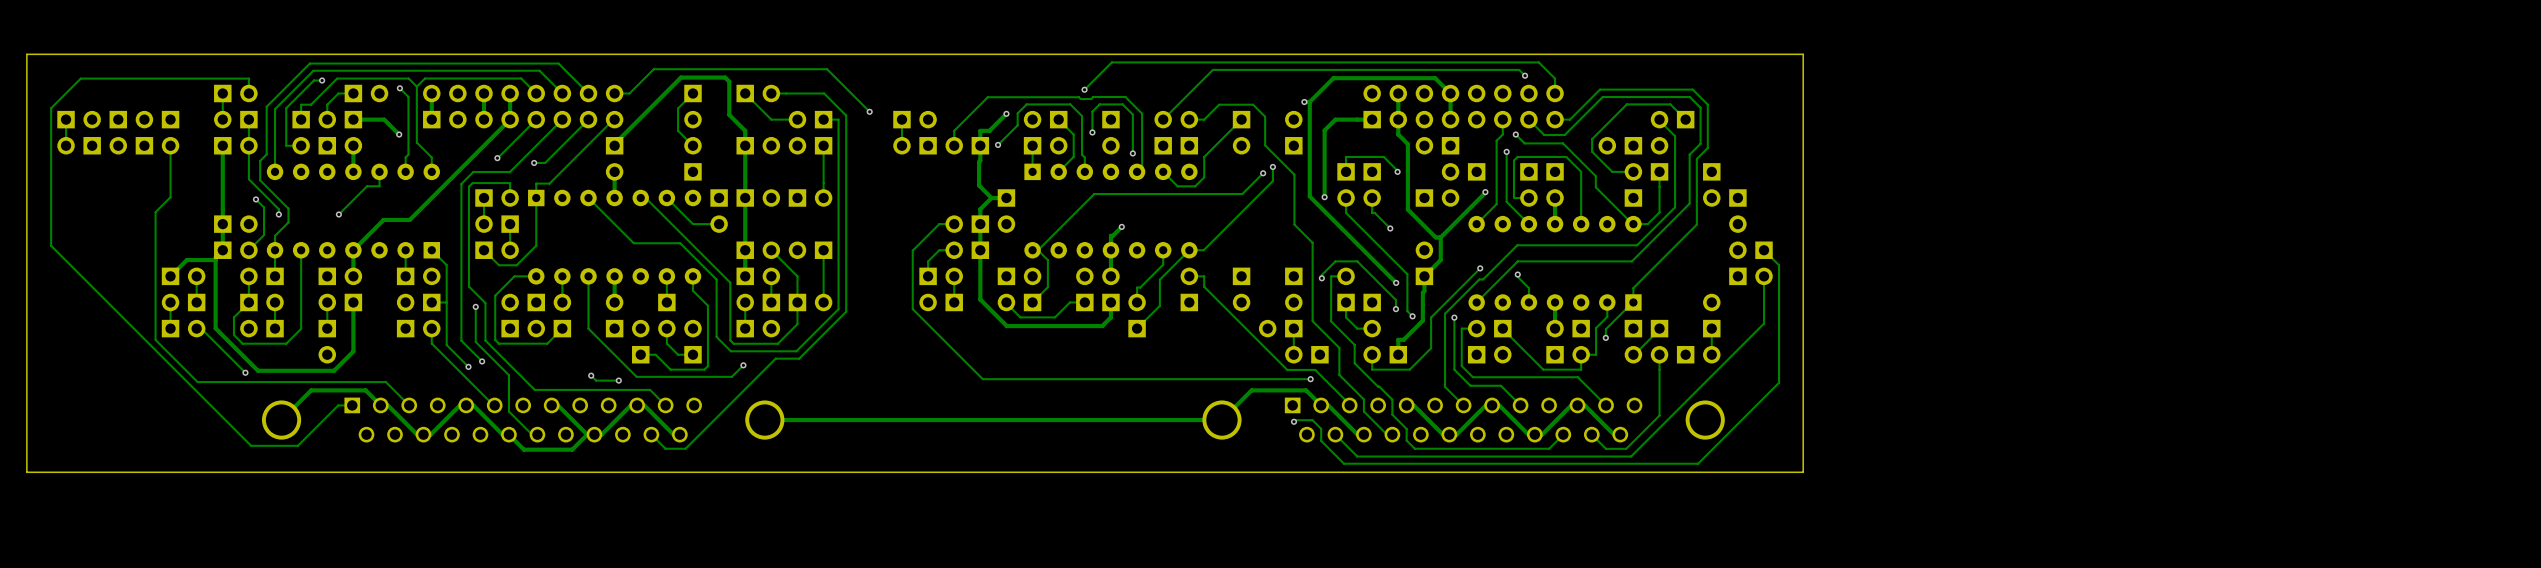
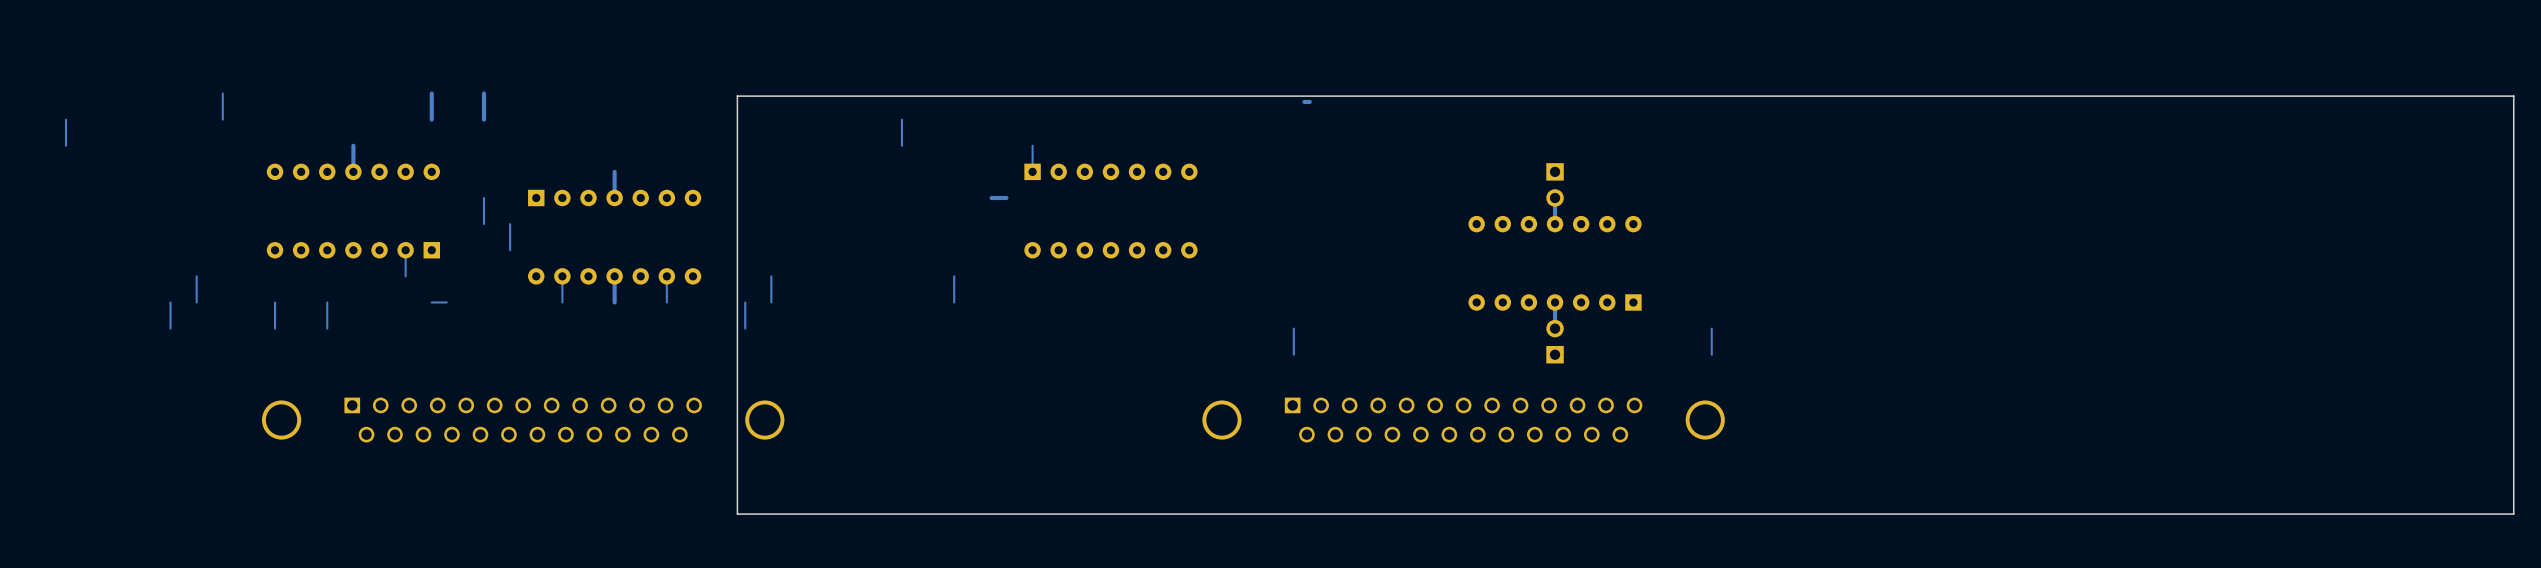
board edge: (1803, 54) (1803, 472) (26, 472) (26, 54) (1803, 54) -> none
track: (1525, 75) (1519, 69) (1212, 69) (1163, 119) -> none
via: (1525, 75) -> none
track: (322, 80) (313, 80) (286, 108) (286, 145) (301, 145) -> none
via: (322, 80) -> none
track: (416, 86) (408, 78) (337, 78) (311, 104) (301, 104) (301, 119) -> none
track: (416, 86) (416, 142) (431, 157) (431, 171) -> none
track: (416, 86) (425, 78) (521, 78) (536, 93) -> none
track: (399, 88) (408, 96) (408, 154) (405, 157) (405, 171) -> none
via: (399, 88) -> none
track: (1084, 89) (1111, 62) (1538, 62) (1555, 78) (1555, 93) -> none
via: (1084, 89) -> none
part: (235, 93) -> none
track: (248, 93) (248, 78) (80, 78) (51, 108) (51, 245) (251, 445) (297, 445) (338, 405) (352, 405) -> none
track: (353, 93) (338, 93) (327, 104) (327, 119) -> none
part: (366, 93) -> none
track: (510, 93) (510, 119) (409, 219) (383, 219) (353, 250) (353, 276) -> none
track: (562, 93) (539, 70) (313, 70) (275, 109) (275, 171) -> none
track: (588, 93) (558, 63) (309, 63) (266, 106) (266, 154) (260, 160) (260, 180) (288, 208) (288, 222) (275, 235) (275, 276) -> none
track: (614, 93) (629, 93) (653, 69) (827, 69) (869, 111) -> none
track: (692, 93) (678, 108) (678, 130) (692, 145) -> none
track: (745, 93) (771, 119) (797, 119) -> none
part: (758, 93) -> none
track: (771, 93) (824, 93) (846, 115) (846, 311) (799, 358) (775, 358) (685, 448) (665, 448) (651, 434) -> none
track: (1398, 93) (1398, 134) (1407, 144) (1407, 209) (1435, 237) (1440, 237) -> none
board edge: none -> (2513, 96) (2513, 514) (737, 514) (737, 96) (2513, 96)
via: (1304, 102) -> none
part: (523, 106) -> none
part: (692, 106) -> none
part: (1463, 106) -> none
via: (869, 111) -> none
track: (1006, 113) (989, 130) (980, 130) (979, 185) (991, 197) (980, 209) (980, 299) (1006, 326) (1102, 326) (1110, 317) (1110, 302) -> none
via: (1006, 113) -> none
part: (79, 119) -> none
part: (235, 119) -> none
track: (248, 119) (248, 179) (278, 209) (278, 214) -> none
track: (353, 119) (384, 119) (399, 134) -> none
track: (536, 119) (497, 158) -> none
track: (562, 119) (510, 172) (473, 172) (461, 183) (461, 340) (482, 361) -> none
track: (588, 119) (545, 162) (534, 162) -> none
track: (614, 119) (549, 183) (536, 183) (536, 245) (516, 265) (499, 265) (484, 250) -> none
part: (810, 119) -> none
track: (823, 119) (838, 119) (838, 309) (796, 351) (730, 351) (716, 336) (716, 279) (680, 243) (633, 243) (588, 197) -> none
part: (915, 119) -> none
track: (1058, 119) (1073, 134) (1073, 156) (1058, 171) -> none
track: (1189, 119) (1204, 119) (1219, 104) (1253, 104) (1265, 116) (1265, 145) (1294, 174) (1294, 224) (1312, 242) (1312, 321) (1339, 347) (1339, 374) (1363, 399) (1363, 411) (1387, 434) (1392, 434) -> none
track: (1241, 119) (1204, 156) (1204, 177) (1195, 186) (1177, 186) (1163, 171) -> none
track: (1372, 119) (1335, 119) (1324, 130) (1324, 197) -> none
track: (1450, 119) (1450, 93) (1435, 78) (1333, 78) (1309, 102) (1309, 196) (1396, 282) -> none
track: (1502, 119) (1502, 134) (1496, 140) (1496, 204) (1476, 224) -> none
track: (1528, 119) (1544, 135) (1564, 135) (1602, 97) (1689, 97) (1700, 107) (1700, 143) (1689, 154) (1689, 203) (1631, 261) (1517, 261) (1476, 302) -> none
track: (1555, 119) (1569, 119) (1599, 89) (1692, 89) (1707, 104) (1707, 148) (1696, 158) (1696, 224) (1633, 288) (1633, 302) (1605, 329) (1605, 337) -> none
track: (1659, 119) (1675, 136) (1675, 207) (1637, 245) (1517, 245) (1445, 313) (1445, 386) (1463, 405) -> none
part: (1672, 119) -> none
track: (1685, 119) (1670, 104) (1626, 104) (1592, 139) (1592, 151) (1612, 171) (1633, 171) -> none
part: (118, 132) -> none
part: (144, 132) -> none
part: (170, 132) -> none
part: (301, 132) -> none
part: (327, 132) -> none
part: (353, 132) -> none
part: (1032, 132) -> none
part: (1058, 132) -> none
track: (1092, 132) (1092, 111) (1099, 104) (1122, 104) (1132, 114) (1132, 153) -> none
via: (1092, 132) -> none
part: (1110, 132) -> none
part: (1163, 132) -> none
part: (1189, 132) -> none
part: (1241, 132) -> none
part: (1293, 132) -> none
via: (399, 134) -> none
track: (1515, 134) (1524, 143) (1563, 143) (1595, 176) (1595, 187) (1632, 224) (1647, 224) (1659, 212) (1659, 171) -> none
via: (1515, 134) -> none
track: (998, 144) (1017, 125) (1017, 113) (1026, 104) (1070, 104) (1082, 116) (1082, 154) (1084, 157) (1084, 171) -> none
via: (998, 144) -> none
part: (79, 145) -> none
track: (170, 145) (170, 197) (155, 212) (155, 339) (197, 382) (385, 382) (409, 405) -> none
track: (222, 145) (222, 250) (215, 257) (215, 328) (258, 370) (334, 370) (353, 351) (353, 302) -> none
part: (235, 145) -> none
track: (614, 145) (681, 77) (725, 77) (729, 81) (729, 114) (745, 130) (745, 276) -> none
part: (758, 145) -> none
part: (810, 145) -> none
track: (823, 145) (823, 197) -> none
part: (915, 145) -> none
track: (954, 145) (954, 130) (987, 97) (1078, 97) (1080, 99) (1091, 99) (1093, 97) (1125, 97) (1142, 113) (1142, 166) (1137, 171) -> none
part: (967, 145) -> none
part: (1437, 145) -> none
part: (1620, 145) -> none
track: (1506, 151) (1506, 201) (1528, 224) -> none
via: (1506, 151) -> none
via: (1132, 153) -> none
via: (497, 158) -> none
part: (614, 158) -> none
part: (692, 158) -> none
part: (1659, 158) -> none
via: (534, 162) -> none
track: (1272, 166) (1272, 181) (1203, 250) (1189, 250) (1159, 279) (1159, 305) (1137, 328) -> none
via: (1272, 166) -> none
track: (379, 171) (379, 186) (367, 186) (338, 214) -> none
track: (1397, 171) (1383, 156) (1346, 156) (1346, 171) -> none
via: (1397, 171) -> none
part: (1463, 171) -> none
track: (1263, 173) (1242, 194) (1094, 194) (1038, 250) -> none
via: (1263, 173) -> none
part: (1346, 184) -> none
part: (1372, 184) -> none
part: (1528, 184) -> none
part: (1633, 184) -> none
part: (1711, 184) -> none
track: (1485, 192) (1440, 237) -> none
via: (1485, 192) -> none
part: (497, 197) -> none
track: (510, 197) (510, 183) (472, 183) (468, 186) (468, 286) (485, 303) (485, 340) (534, 389) (650, 389) (665, 405) -> none
track: (640, 197) (645, 197) (730, 282) (730, 340) (733, 343) (777, 343) (797, 324) (797, 276) (771, 250) -> none
track: (666, 197) (692, 224) (719, 224) -> none
part: (758, 197) -> none
part: (810, 197) -> none
via: (1324, 197) -> none
track: (1346, 197) (1346, 212) (1407, 274) (1407, 311) (1412, 316) -> none
track: (1372, 197) (1372, 212) (1374, 212) (1390, 228) -> none
part: (1437, 197) -> none
track: (1528, 197) (1514, 197) (1514, 160) (1517, 156) (1566, 156) (1581, 171) (1581, 224) -> none
track: (255, 199) (264, 207) (264, 235) (248, 250) -> none
via: (255, 199) -> none
part: (719, 211) -> none
part: (1006, 211) -> none
part: (1737, 211) -> none
via: (278, 214) -> none
via: (338, 214) -> none
part: (235, 224) -> none
part: (497, 224) -> none
track: (954, 224) (939, 224) (912, 250) (912, 309) (982, 379) (1310, 379) -> none
part: (967, 224) -> none
track: (1121, 226) (1110, 235) (1110, 276) -> none
via: (1121, 226) -> none
via: (1390, 228) -> none
track: (1440, 237) (1440, 260) (1424, 276) (1422, 320) (1403, 339) (1398, 339) (1398, 354) -> none
part: (235, 250) -> none
track: (301, 250) (301, 328) (286, 343) (242, 343) (233, 334) (233, 317) (248, 302) (248, 276) -> none
track: (431, 250) (446, 265) (446, 345) (468, 366) -> none
part: (497, 250) -> none
part: (758, 250) -> none
part: (810, 250) -> none
track: (823, 250) (823, 302) -> none
track: (954, 250) (939, 250) (928, 261) (928, 276) -> none
part: (967, 250) -> none
track: (1032, 250) (1038, 250) (1047, 260) (1047, 287) (1032, 302) -> none
track: (1163, 250) (1163, 264) (1140, 287) (1137, 287) (1137, 302) -> none
part: (1750, 250) -> none
track: (1764, 250) (1779, 265) (1779, 382) (1698, 463) (1344, 463) (1321, 440) (1321, 428) (1312, 420) (1294, 421) -> none
track: (215, 260) (186, 260) (170, 276) -> none
part: (1424, 263) -> none
track: (1480, 268) (1431, 317) (1431, 348) (1409, 369) (1372, 369) (1372, 354) -> none
via: (1480, 268) -> none
track: (1517, 274) (1517, 276) (1528, 288) (1528, 302) -> none
via: (1517, 274) -> none
part: (183, 276) -> none
part: (261, 276) -> none
track: (536, 276) (514, 276) (495, 295) (495, 339) (498, 343) (547, 343) (562, 328) -> none
track: (588, 276) (588, 328) (636, 376) (731, 376) (743, 365) -> none
track: (692, 276) (692, 290) (707, 305) (707, 366) (704, 369) (670, 369) (655, 354) (640, 354) -> none
part: (758, 276) -> none
part: (941, 276) -> none
track: (1189, 276) (1204, 276) (1204, 286) (1287, 369) (1315, 369) (1349, 405) -> none
track: (1346, 276) (1331, 276) (1331, 321) (1354, 344) (1354, 363) (1392, 399) (1392, 414) (1406, 428) (1406, 440) (1414, 448) (1549, 448) (1563, 434) -> none
part: (1750, 276) -> none
track: (1764, 276) (1764, 323) (1631, 456) (1357, 456) (1335, 434) -> none
track: (1321, 278) (1321, 274) (1335, 261) (1357, 261) (1395, 300) (1395, 309) -> none
via: (1321, 278) -> none
via: (1396, 282) -> none
part: (327, 289) -> none
part: (353, 289) -> none
part: (405, 289) -> none
part: (431, 289) -> none
part: (1006, 289) -> none
part: (1032, 289) -> none
part: (1084, 289) -> none
part: (1110, 289) -> none
part: (1189, 289) -> none
part: (1241, 289) -> none
part: (1293, 289) -> none
part: (1346, 289) -> none
part: (183, 302) -> none
part: (261, 302) -> none
part: (758, 302) -> none
part: (810, 302) -> none
part: (941, 302) -> none
track: (1084, 302) (1069, 302) (1055, 317) (1020, 317) (1006, 302) -> none
track: (1346, 302) (1346, 317) (1357, 328) (1372, 328) -> none
track: (1607, 302) (1607, 316) (1596, 328) (1596, 354) (1581, 354) (1581, 369) (1543, 369) (1502, 328) -> none
track: (475, 306) (475, 341) (508, 375) (508, 411) (532, 434) (537, 434) -> none
via: (475, 306) -> none
via: (1395, 309) -> none
part: (510, 315) -> none
part: (536, 315) -> none
part: (562, 315) -> none
part: (614, 315) -> none
part: (666, 315) -> none
part: (1137, 315) -> none
part: (1372, 315) -> none
part: (1711, 315) -> none
via: (1412, 316) -> none
track: (1454, 317) (1454, 369) (1470, 385) (1500, 385) (1520, 405) -> none
via: (1454, 317) -> none
part: (183, 328) -> none
track: (196, 328) (201, 328) (245, 372) -> none
part: (261, 328) -> none
part: (418, 328) -> none
track: (431, 328) (431, 343) (494, 405) -> none
track: (666, 328) (666, 343) (678, 354) (692, 354) -> none
part: (758, 328) -> none
part: (1280, 328) -> none
track: (1476, 328) (1461, 328) (1461, 366) (1472, 377) (1577, 377) (1606, 405) -> none
track: (1659, 328) (1633, 354) -> none
via: (1605, 337) -> none
part: (327, 341) -> none
part: (640, 341) -> none
part: (692, 341) -> none
part: (1476, 341) -> none
part: (1502, 341) -> none
part: (1581, 341) -> none
part: (1633, 341) -> none
part: (1659, 341) -> none
part: (1306, 354) -> none
part: (1385, 354) -> none
track: (1659, 354) (1659, 415) (1626, 448) (1606, 448) (1591, 434) -> none
part: (1698, 354) -> none
via: (482, 361) -> none
via: (743, 365) -> none
via: (468, 366) -> none
via: (245, 372) -> none
track: (591, 375) (596, 380) (618, 380) -> none
via: (591, 375) -> none
via: (1310, 379) -> none
via: (618, 380) -> none
track: (551, 405) (558, 405) (587, 434) -> none
track: (1406, 405) (1413, 405) (1443, 434) (1456, 434) (1485, 405) (1499, 405) (1528, 434) (1542, 434) (1571, 405) (1584, 405) (1613, 434) (1620, 434) -> none
track: (281, 420) (311, 390) (365, 390) (380, 405) (387, 405) (417, 434) (430, 434) (459, 405) (473, 405) (502, 434) (508, 434) (523, 449) (572, 449) (587, 434) -> none
track: (764, 420) (1221, 420) (1251, 390) (1306, 390) (1321, 405) (1328, 405) (1357, 434) (1363, 434) -> none
via: (1294, 421) -> none
track: (679, 434) (673, 434) (644, 405) (630, 405) (601, 434) (588, 434) -> none

